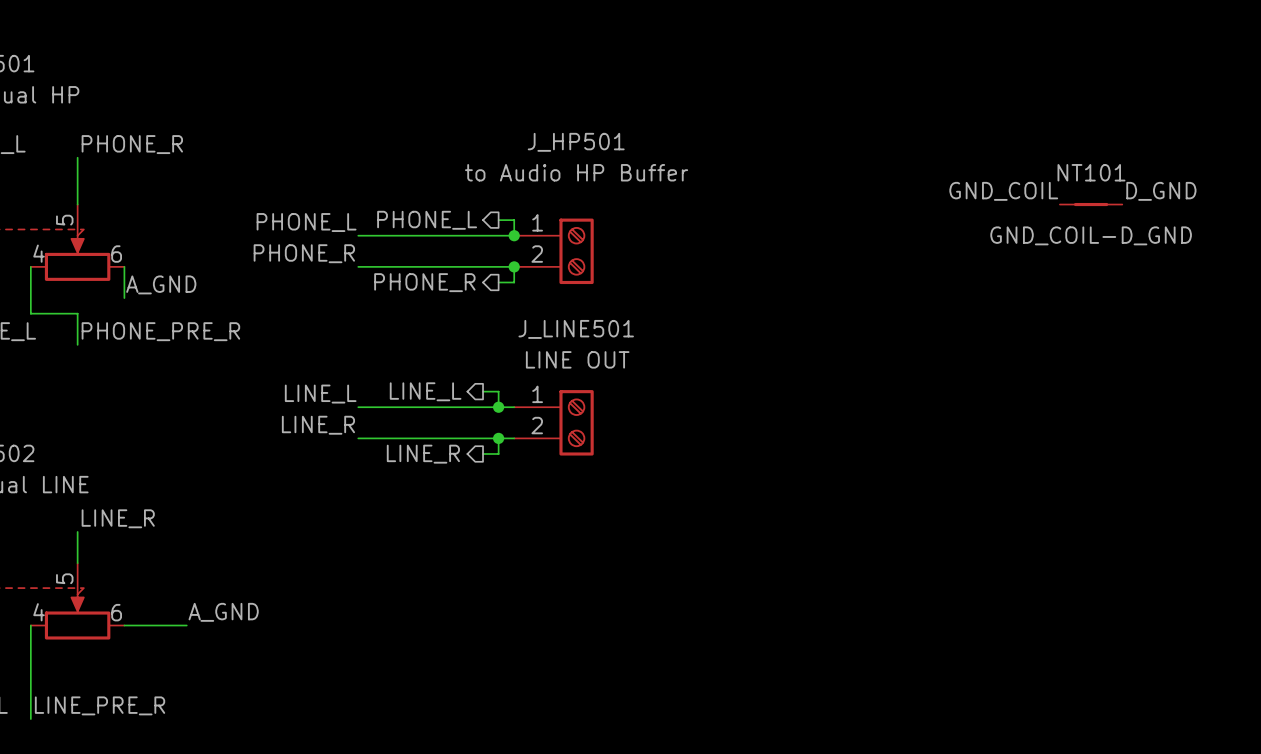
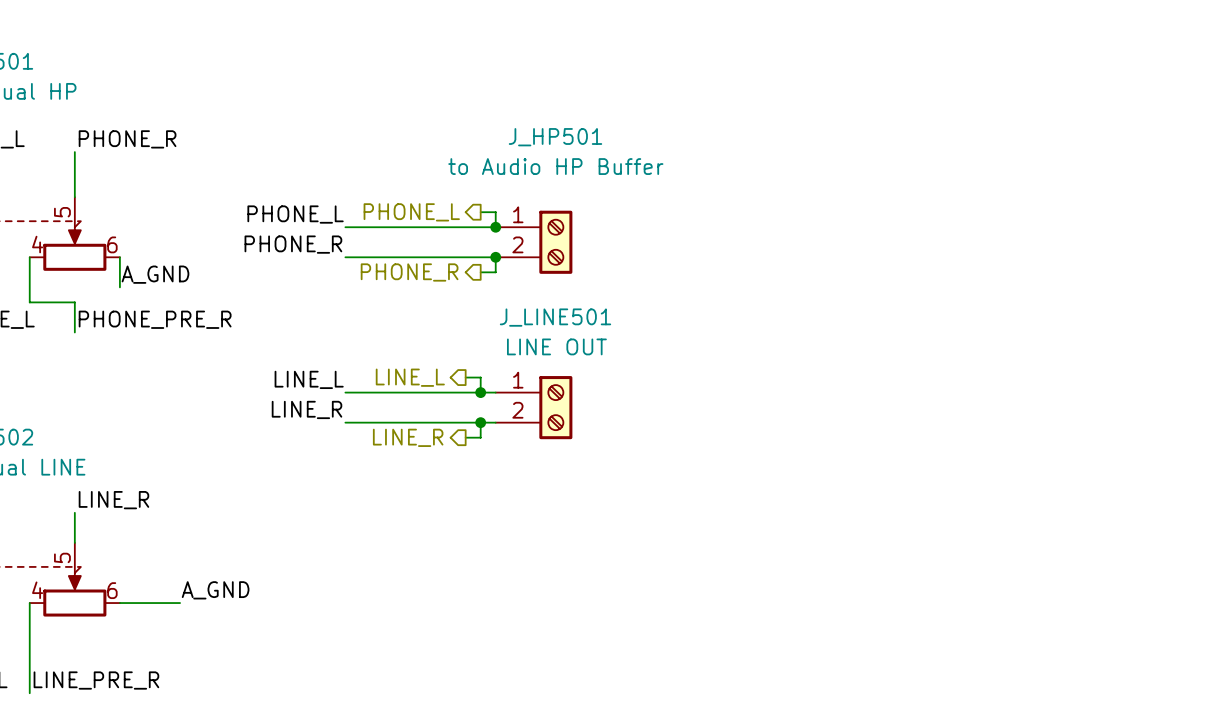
label: GND_COIL (1003, 191) -> none
label: D_GND (1161, 191) -> none
NT101: GND_COIL-D_GND (1091, 204) -> none

